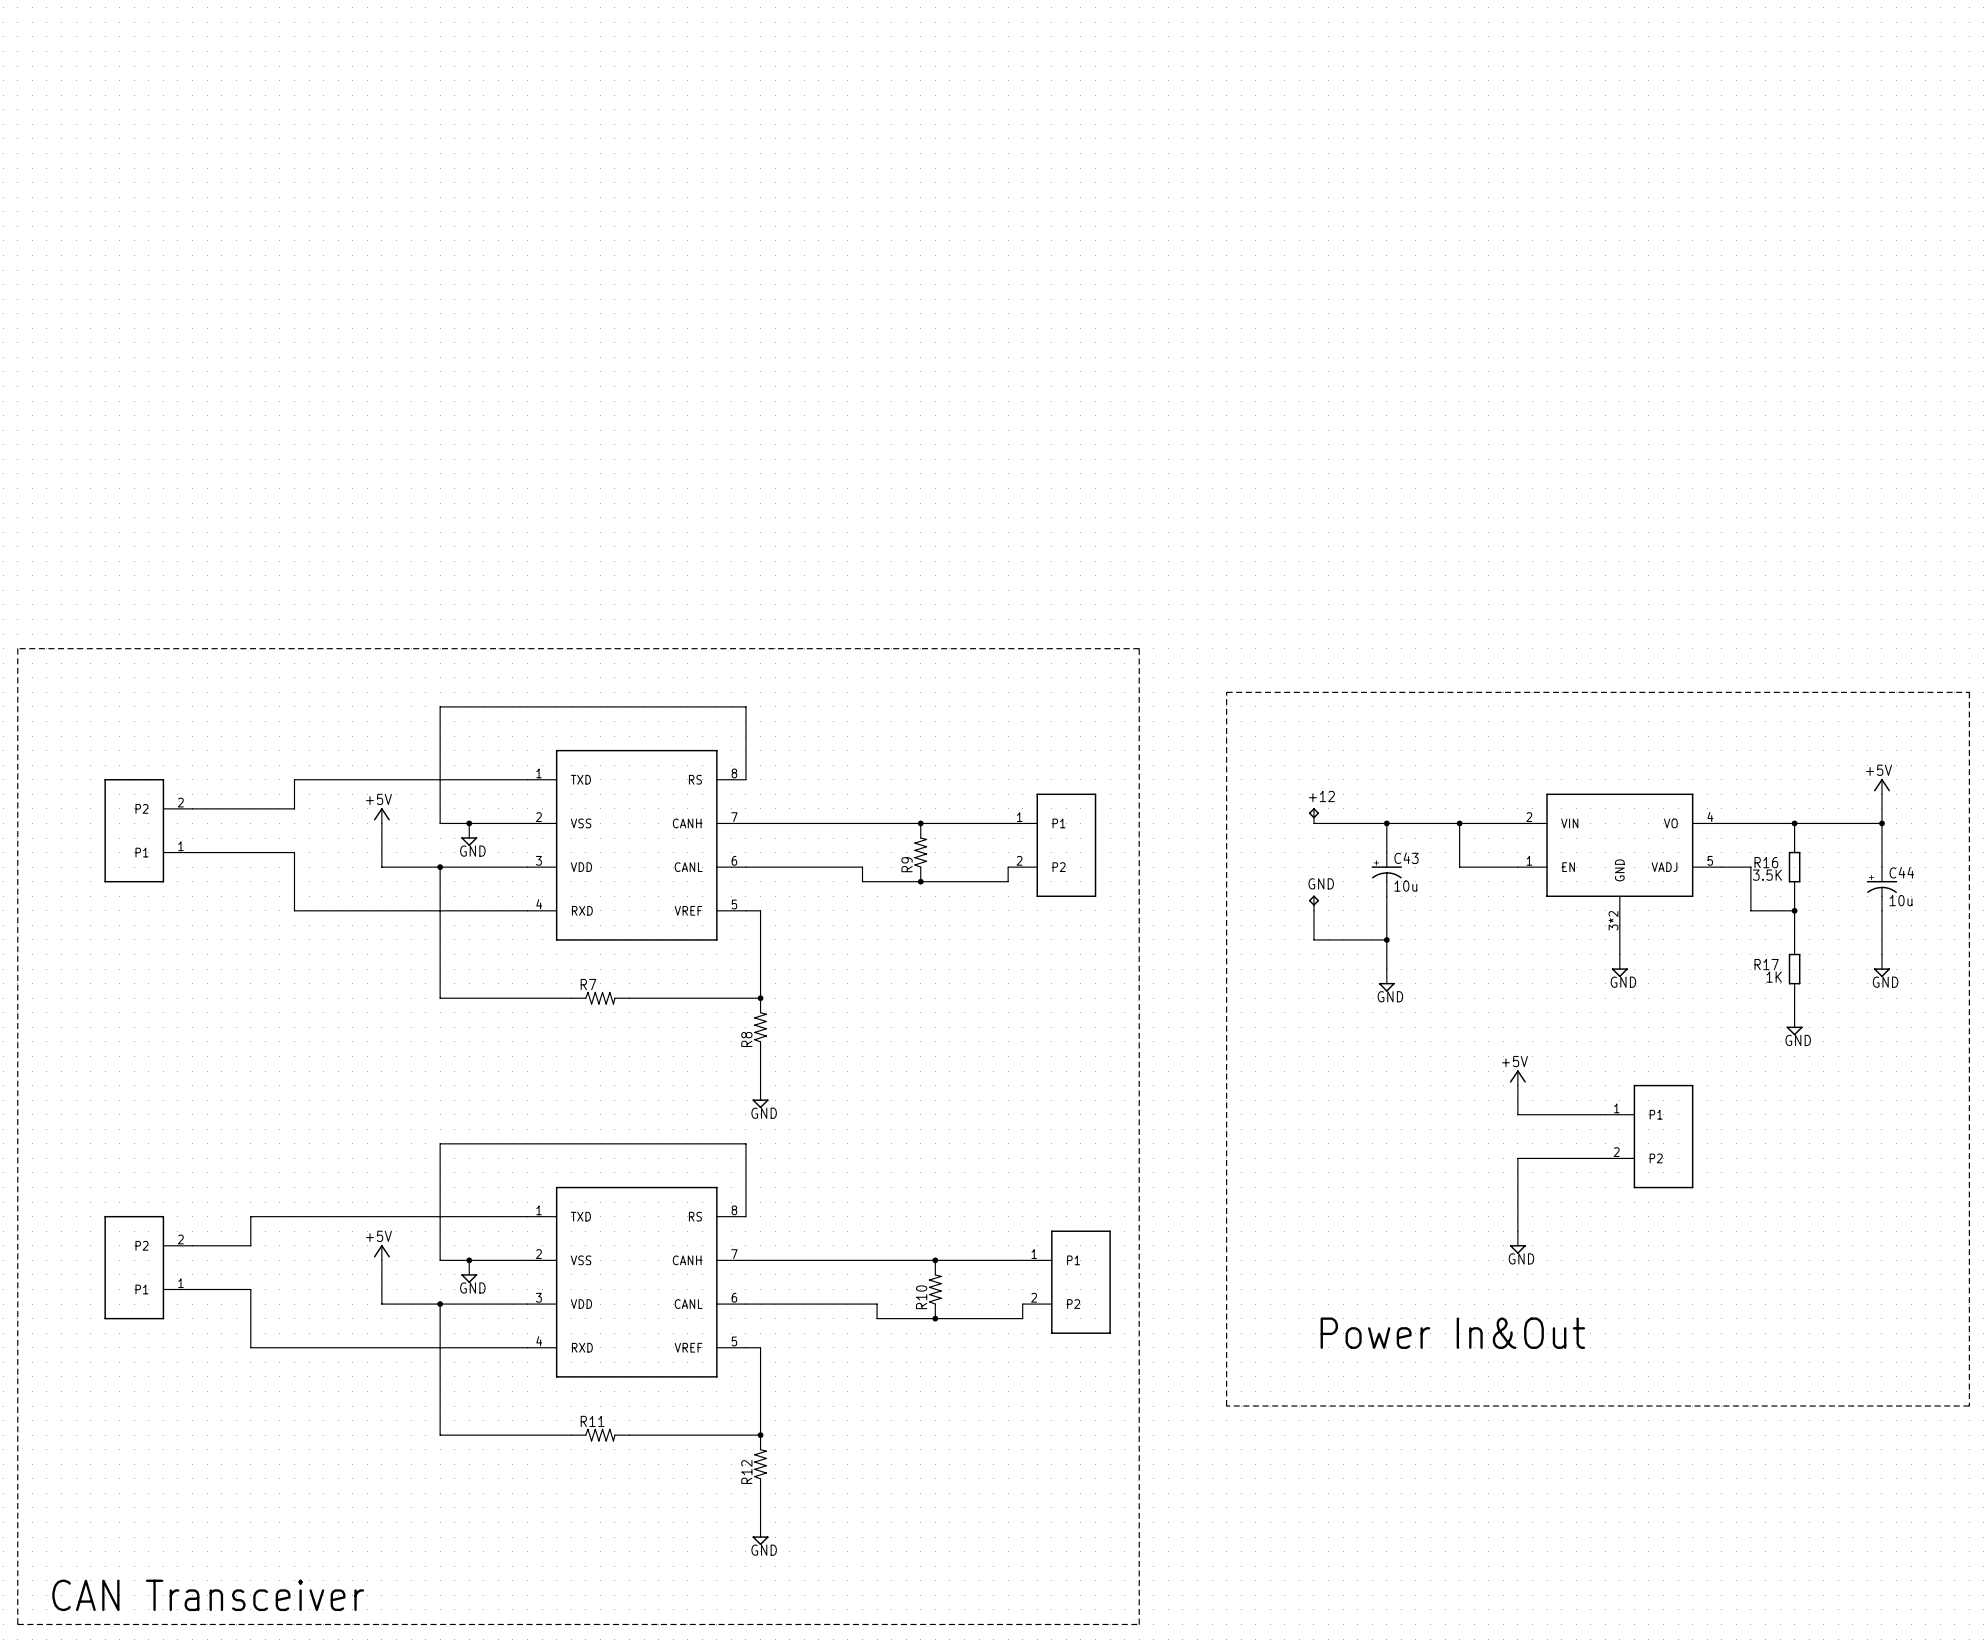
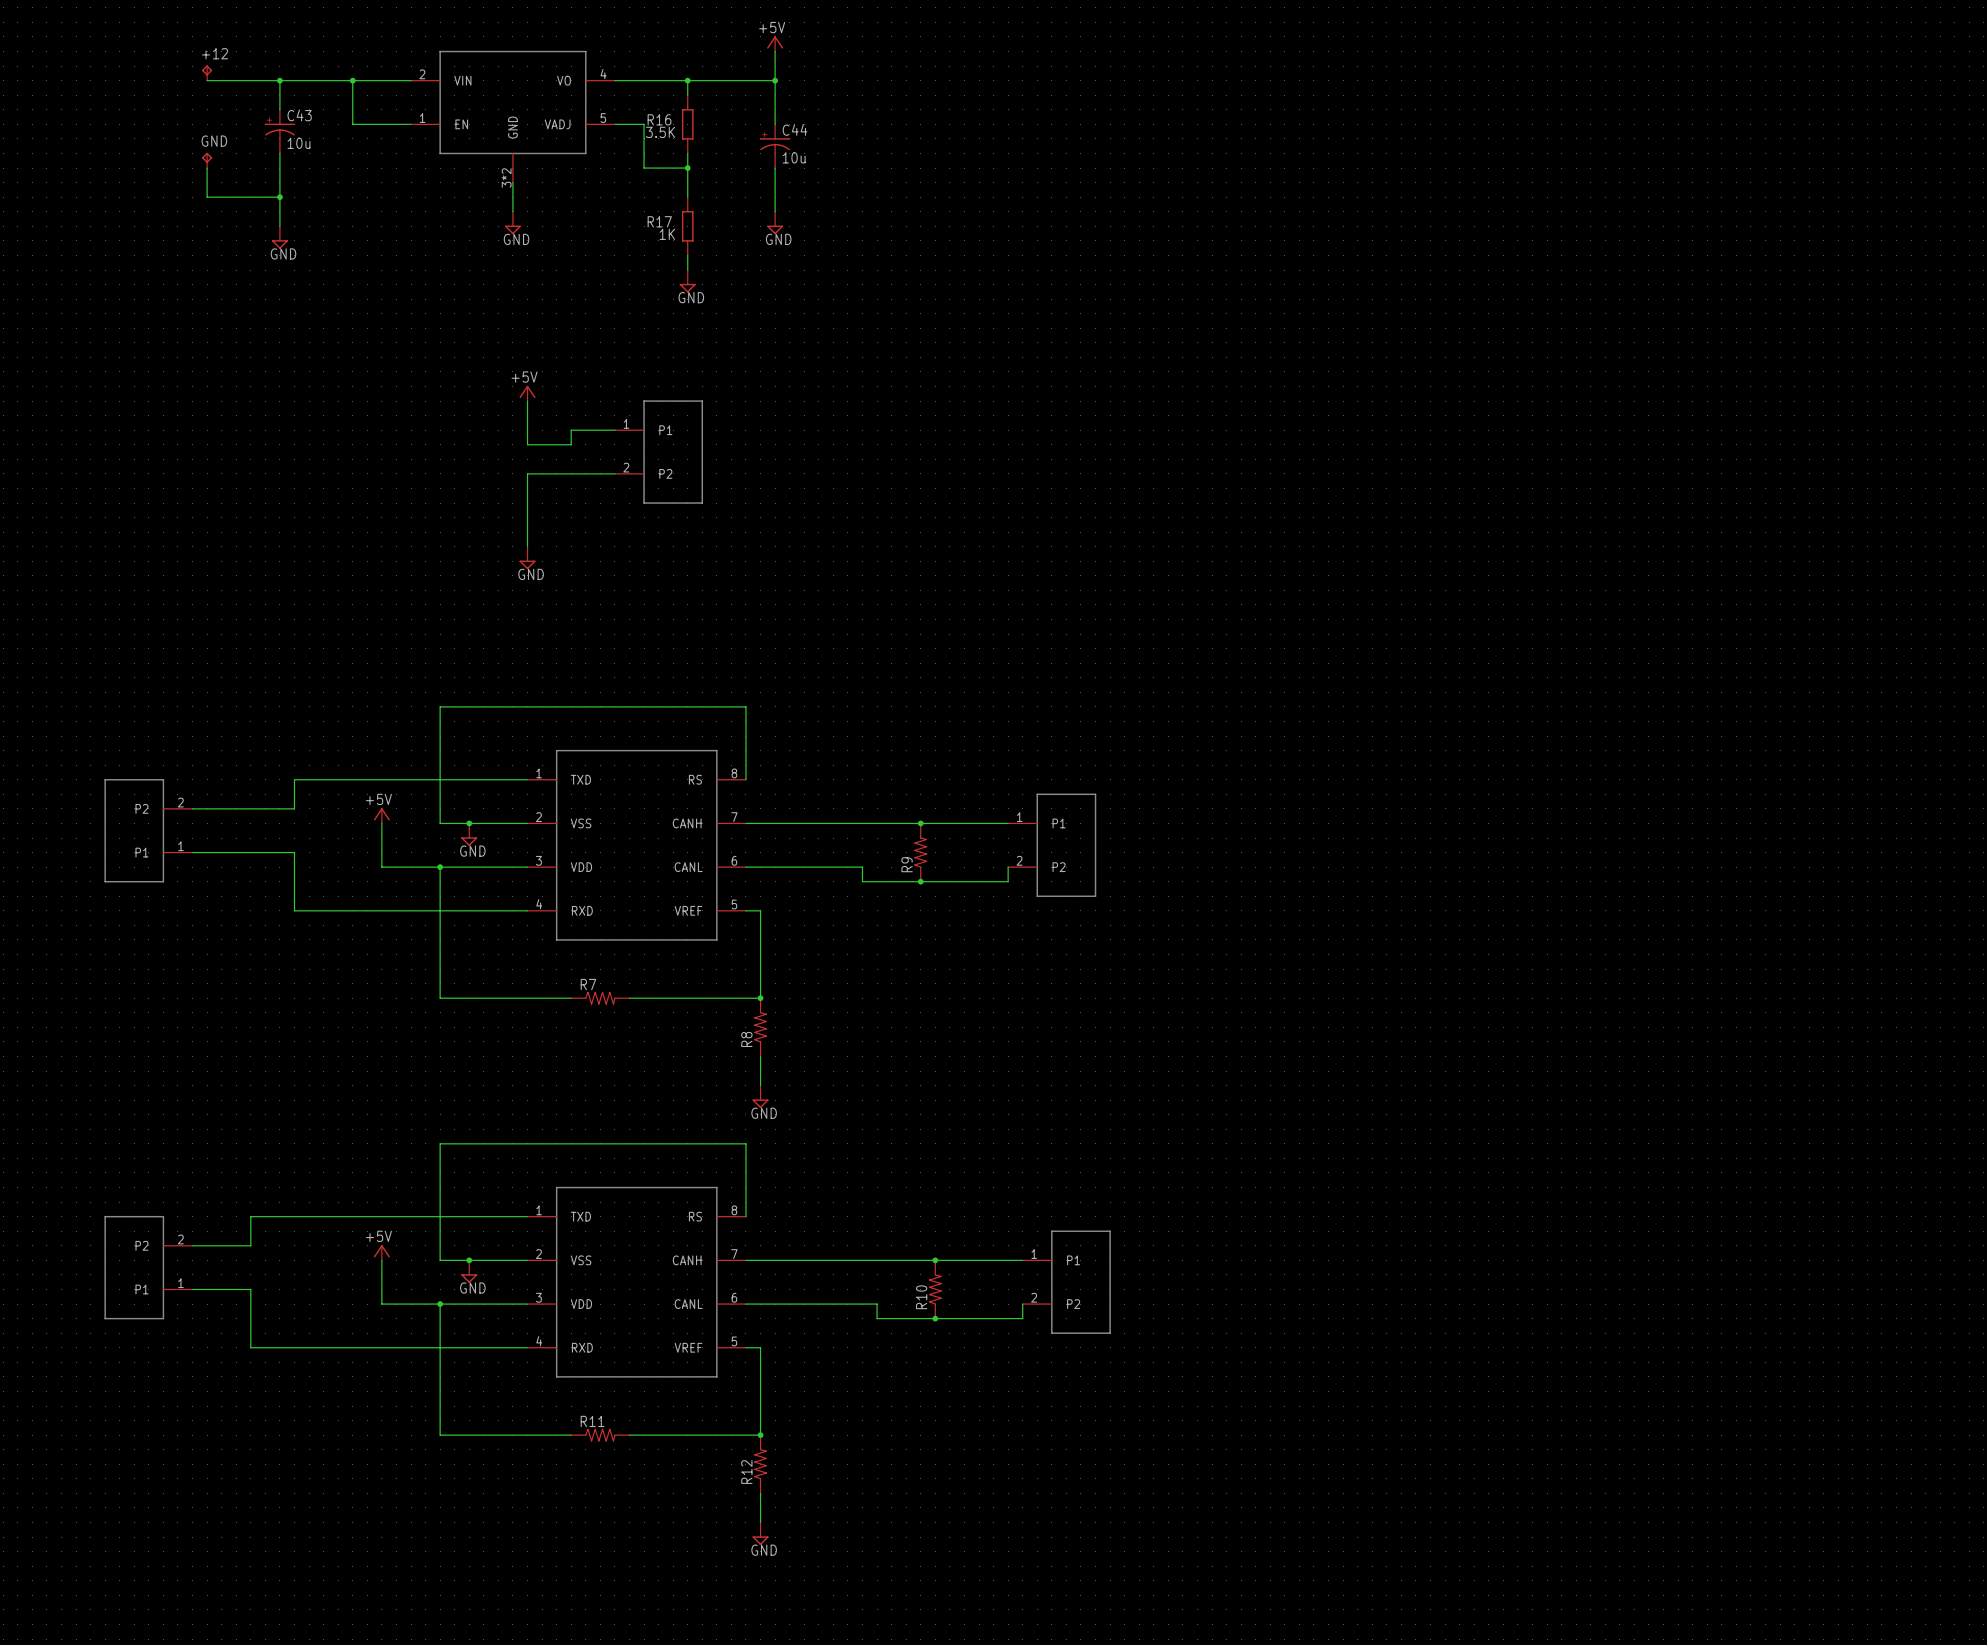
power symbol: none -> +5V (775, 43)
wire: none -> (775, 51) (775, 124)
wire: none -> (207, 80) (411, 80)
wire: none -> (279, 80) (279, 109)
junction: none -> (279, 80)
wire: none -> (352, 80) (352, 124) (411, 124)
junction: none -> (352, 80)
wire: none -> (614, 80) (775, 80)
wire: none -> (687, 80) (687, 95)
junction: none -> (687, 80)
junction: none -> (775, 80)
part: none -> (512, 116)
wire: none -> (614, 124) (644, 124) (644, 168) (687, 168)
wire: none -> (279, 153) (279, 226)
wire: none -> (687, 153) (687, 197)
GND: none -> (207, 160)
wire: none -> (207, 168) (207, 197) (279, 197)
junction: none -> (687, 168)
wire: none -> (775, 168) (775, 211)
wire: none -> (512, 182) (512, 211)
junction: none -> (279, 197)
power symbol: none -> GND (512, 223)
power symbol: none -> GND (775, 223)
power symbol: none -> GND (279, 237)
wire: none -> (687, 255) (687, 270)
power symbol: none -> GND (687, 281)
power symbol: none -> +5V (527, 393)
wire: none -> (527, 401) (527, 444) (571, 444) (571, 430) (614, 430)
part: none -> (658, 452)
wire: none -> (614, 473) (527, 473) (527, 546)
power symbol: none -> GND (527, 558)
line: (17, 648) (17, 1624) (1139, 1624) (1139, 648) (17, 648) -> none
line: (1226, 692) (1969, 692) (1969, 1406) (1226, 1406) (1226, 692) -> none
power symbol: +5V (1881, 786) -> none
wire: (1881, 794) (1881, 867) -> none
+12 position: (1313, 815) -> (207, 73)
wire: (1313, 823) (1517, 823) -> none
wire: (1386, 823) (1386, 852) -> none
junction: (1386, 823) -> none
wire: (1459, 823) (1459, 867) (1517, 867) -> none
junction: (1459, 823) -> none
wire: (1721, 823) (1881, 823) -> none
wire: (1794, 823) (1794, 838) -> none
junction: (1794, 823) -> none
junction: (1881, 823) -> none
part: (1619, 859) -> none
wire: (1721, 867) (1750, 867) (1750, 910) (1794, 910) -> none
R16 position: (1794, 867) -> (687, 124)
C43 position: (1386, 874) -> (279, 131)
C44 position: (1881, 888) -> (775, 146)
wire: (1386, 896) (1386, 969) -> none
wire: (1794, 896) (1794, 939) -> none
GND: (1313, 903) -> none
wire: (1313, 910) (1313, 939) (1386, 939) -> none
junction: (1794, 910) -> none
wire: (1881, 910) (1881, 954) -> none
wire: (1619, 925) (1619, 954) -> none
junction: (1386, 939) -> none
power symbol: GND (1619, 965) -> none
power symbol: GND (1881, 965) -> none
R17 position: (1794, 969) -> (687, 226)
power symbol: GND (1386, 980) -> none
wire: (1794, 998) (1794, 1012) -> none
power symbol: GND (1794, 1024) -> none
power symbol: +5V (1517, 1077) -> none
wire: (1517, 1085) (1517, 1114) (1605, 1114) -> none
part: (1649, 1136) -> none
wire: (1605, 1158) (1517, 1158) (1517, 1231) -> none
power symbol: GND (1517, 1242) -> none
text: Power In&Out (1452, 1333) -> none
text: CAN Transceiver (208, 1595) -> none

